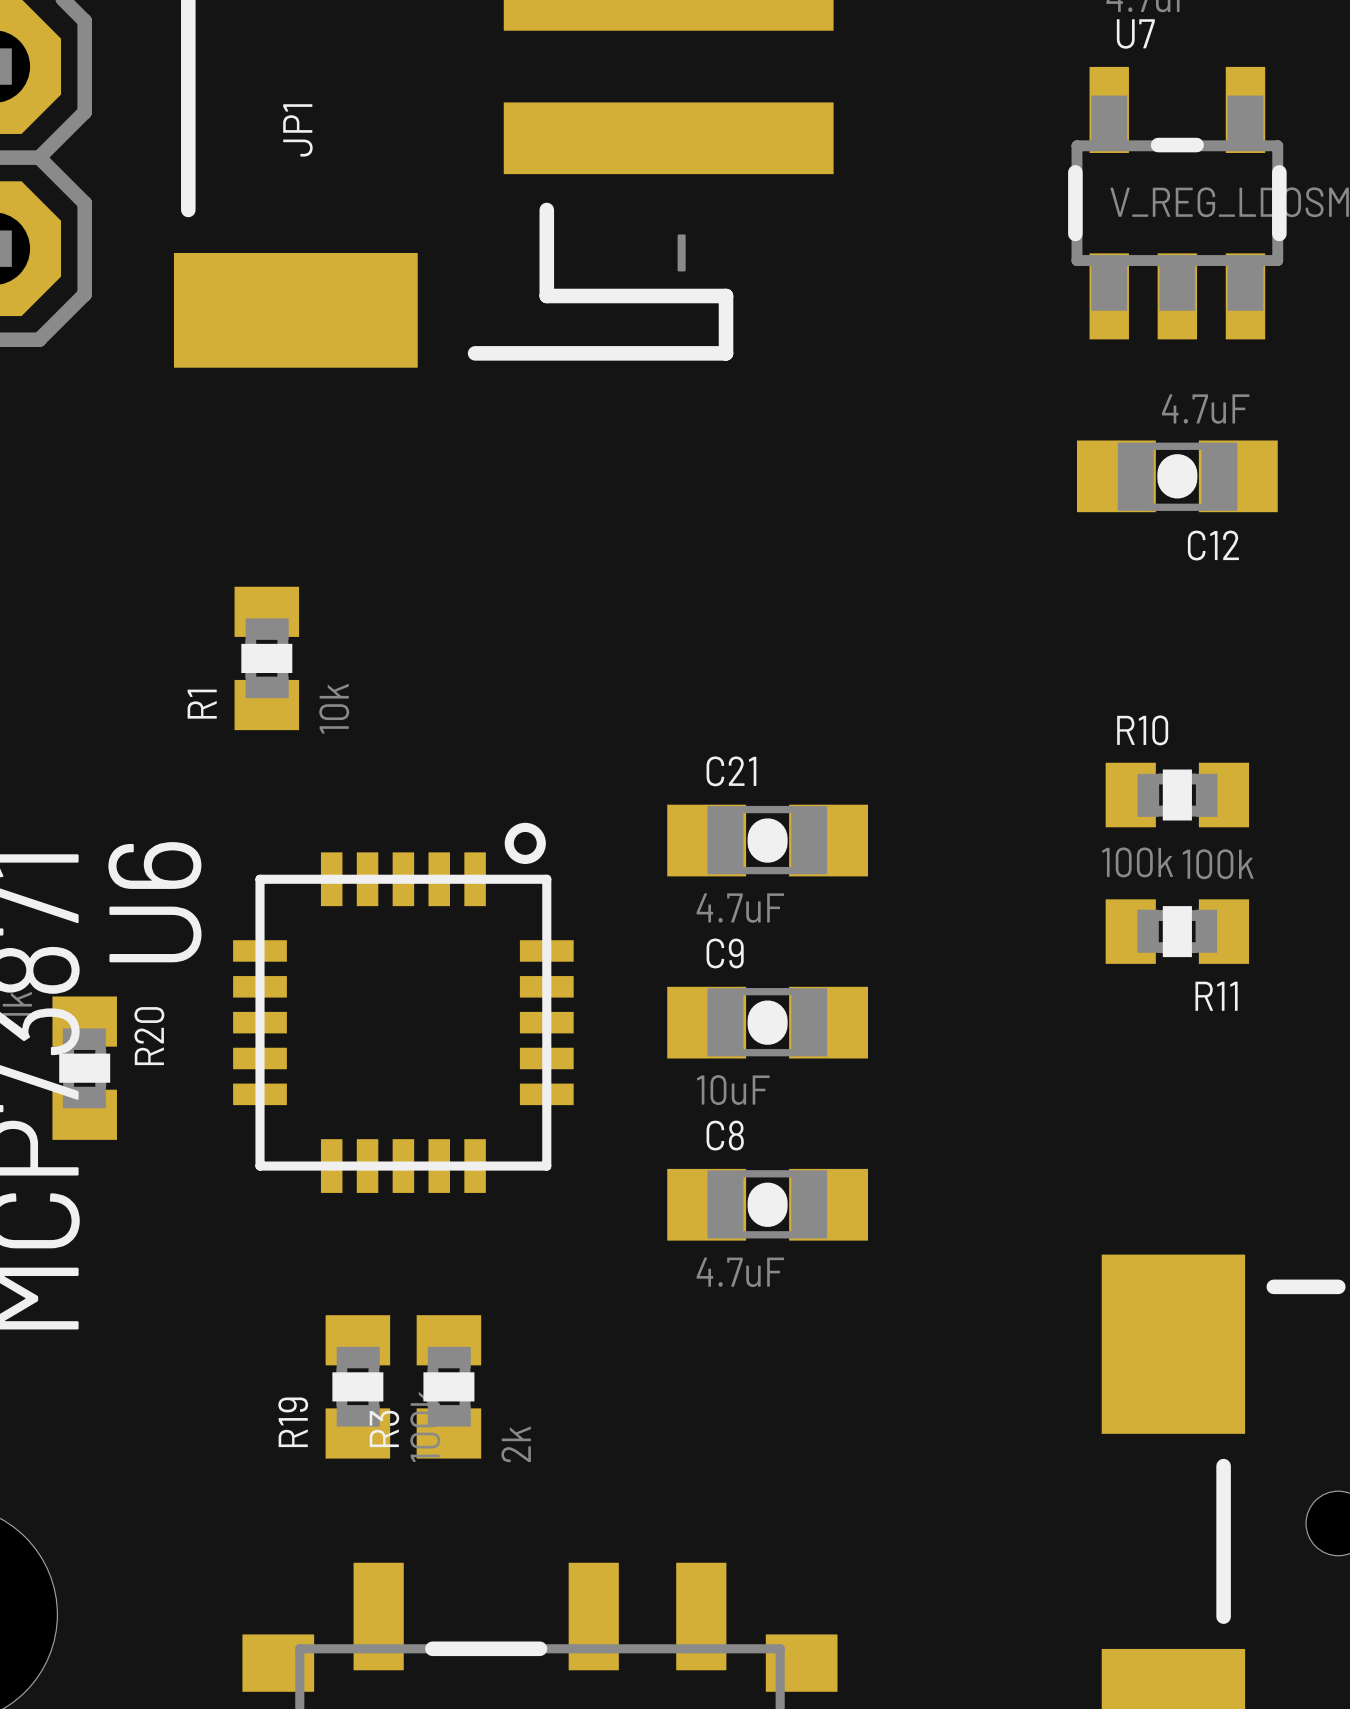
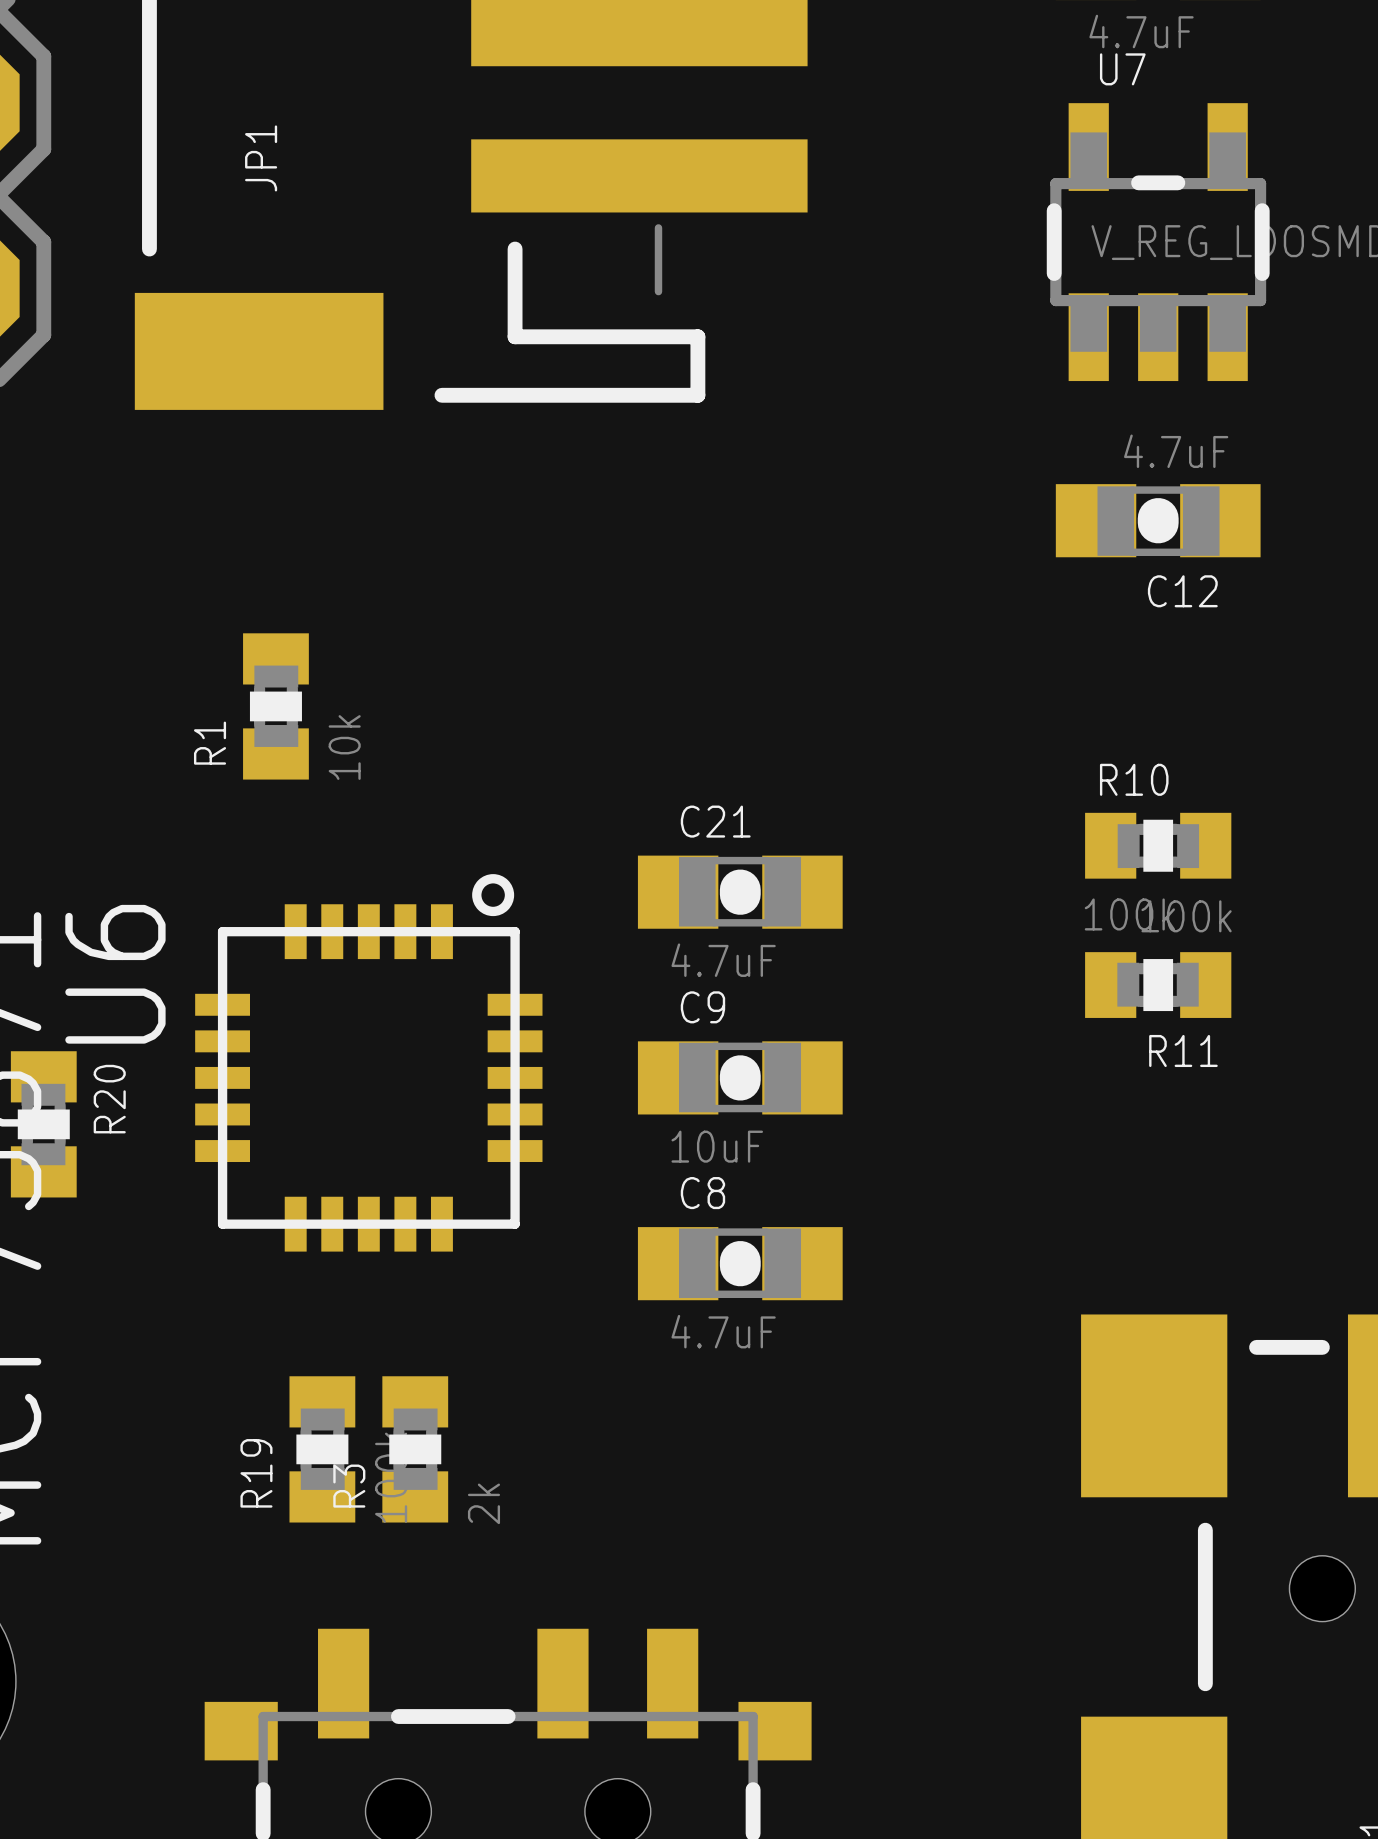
R1 position: (266, 658) -> (275, 706)

